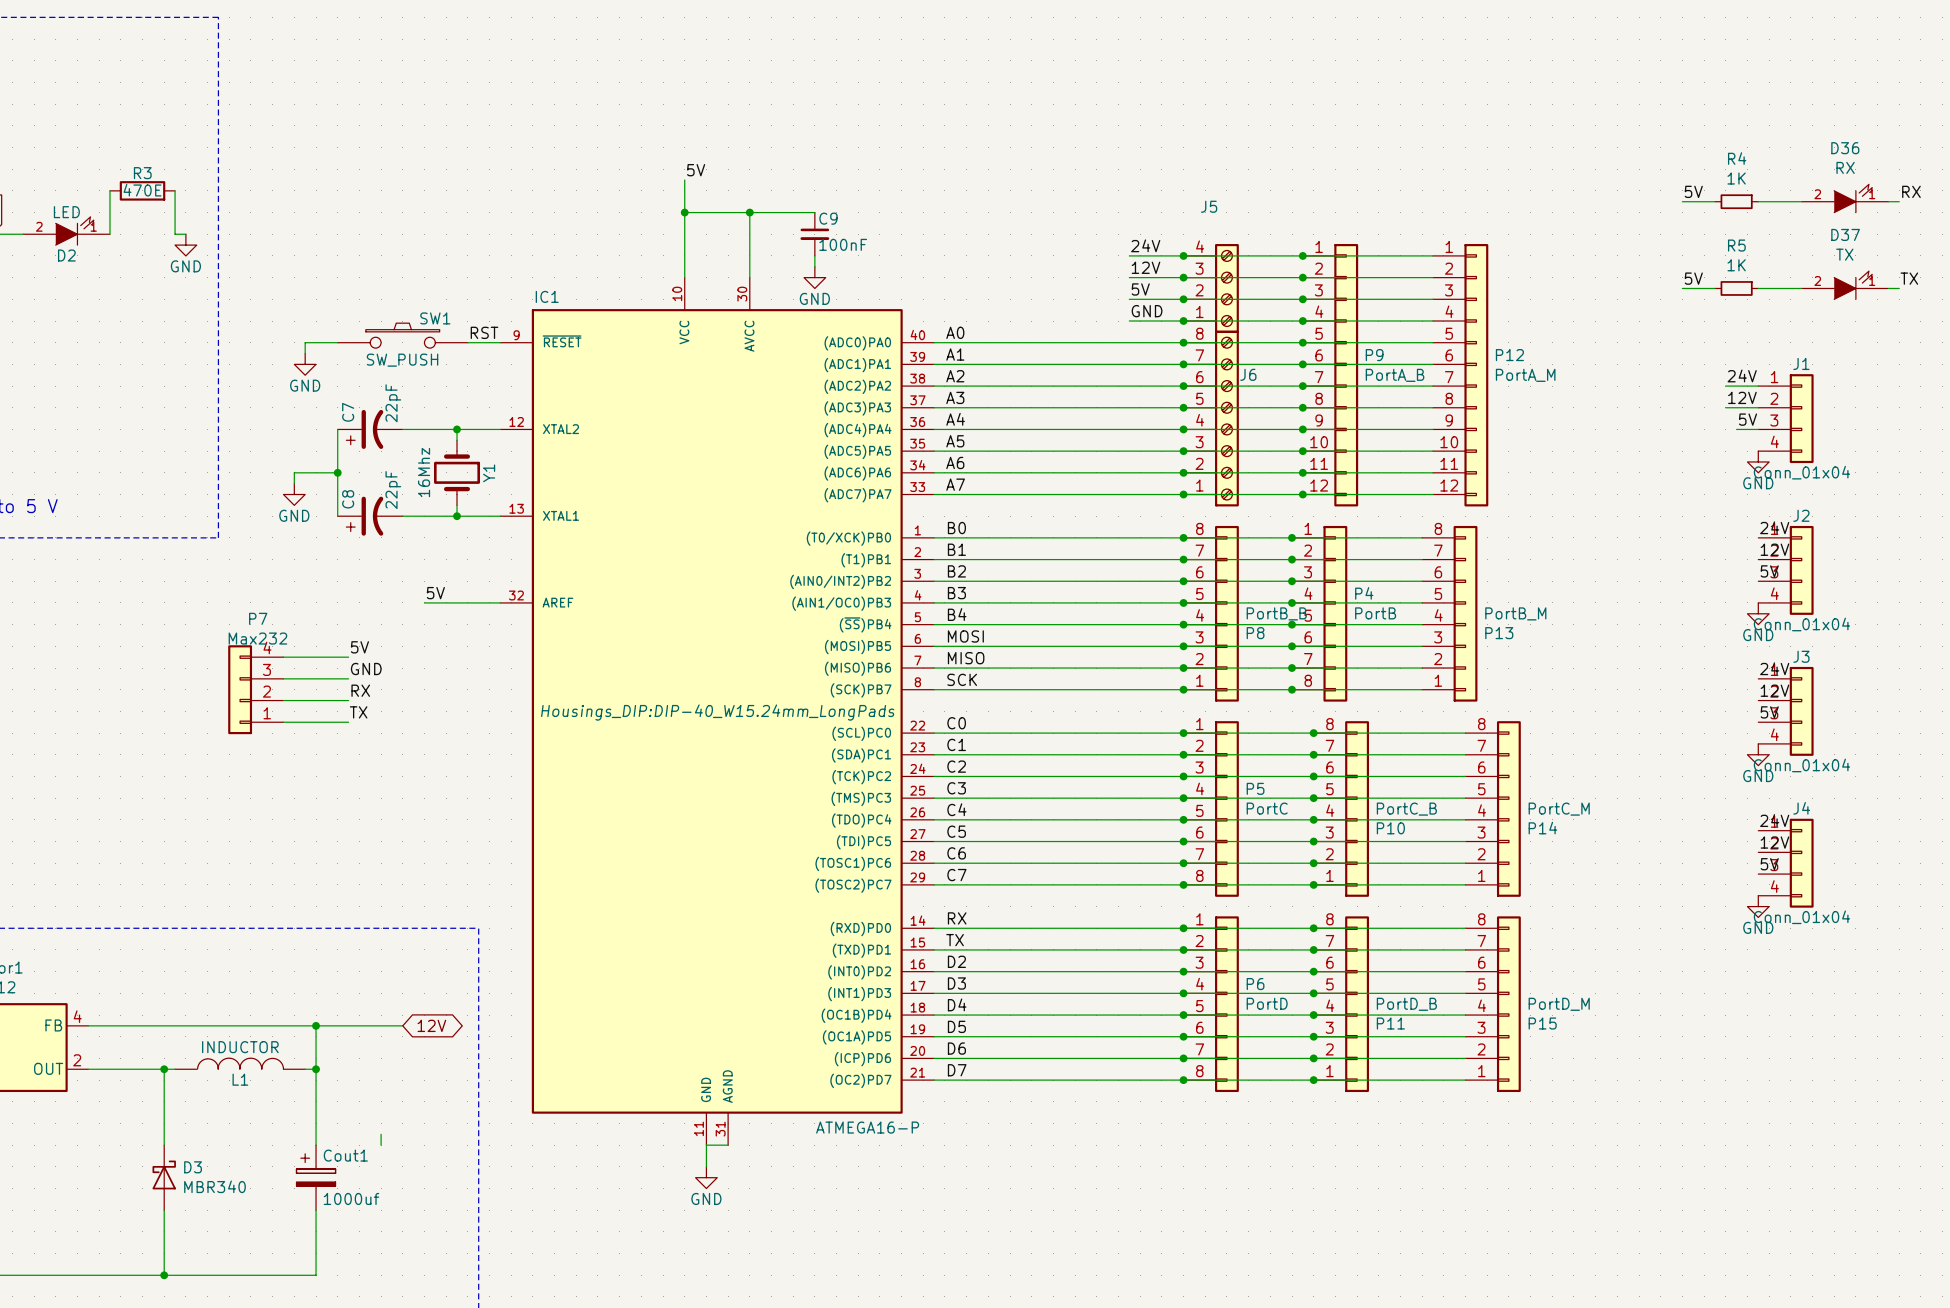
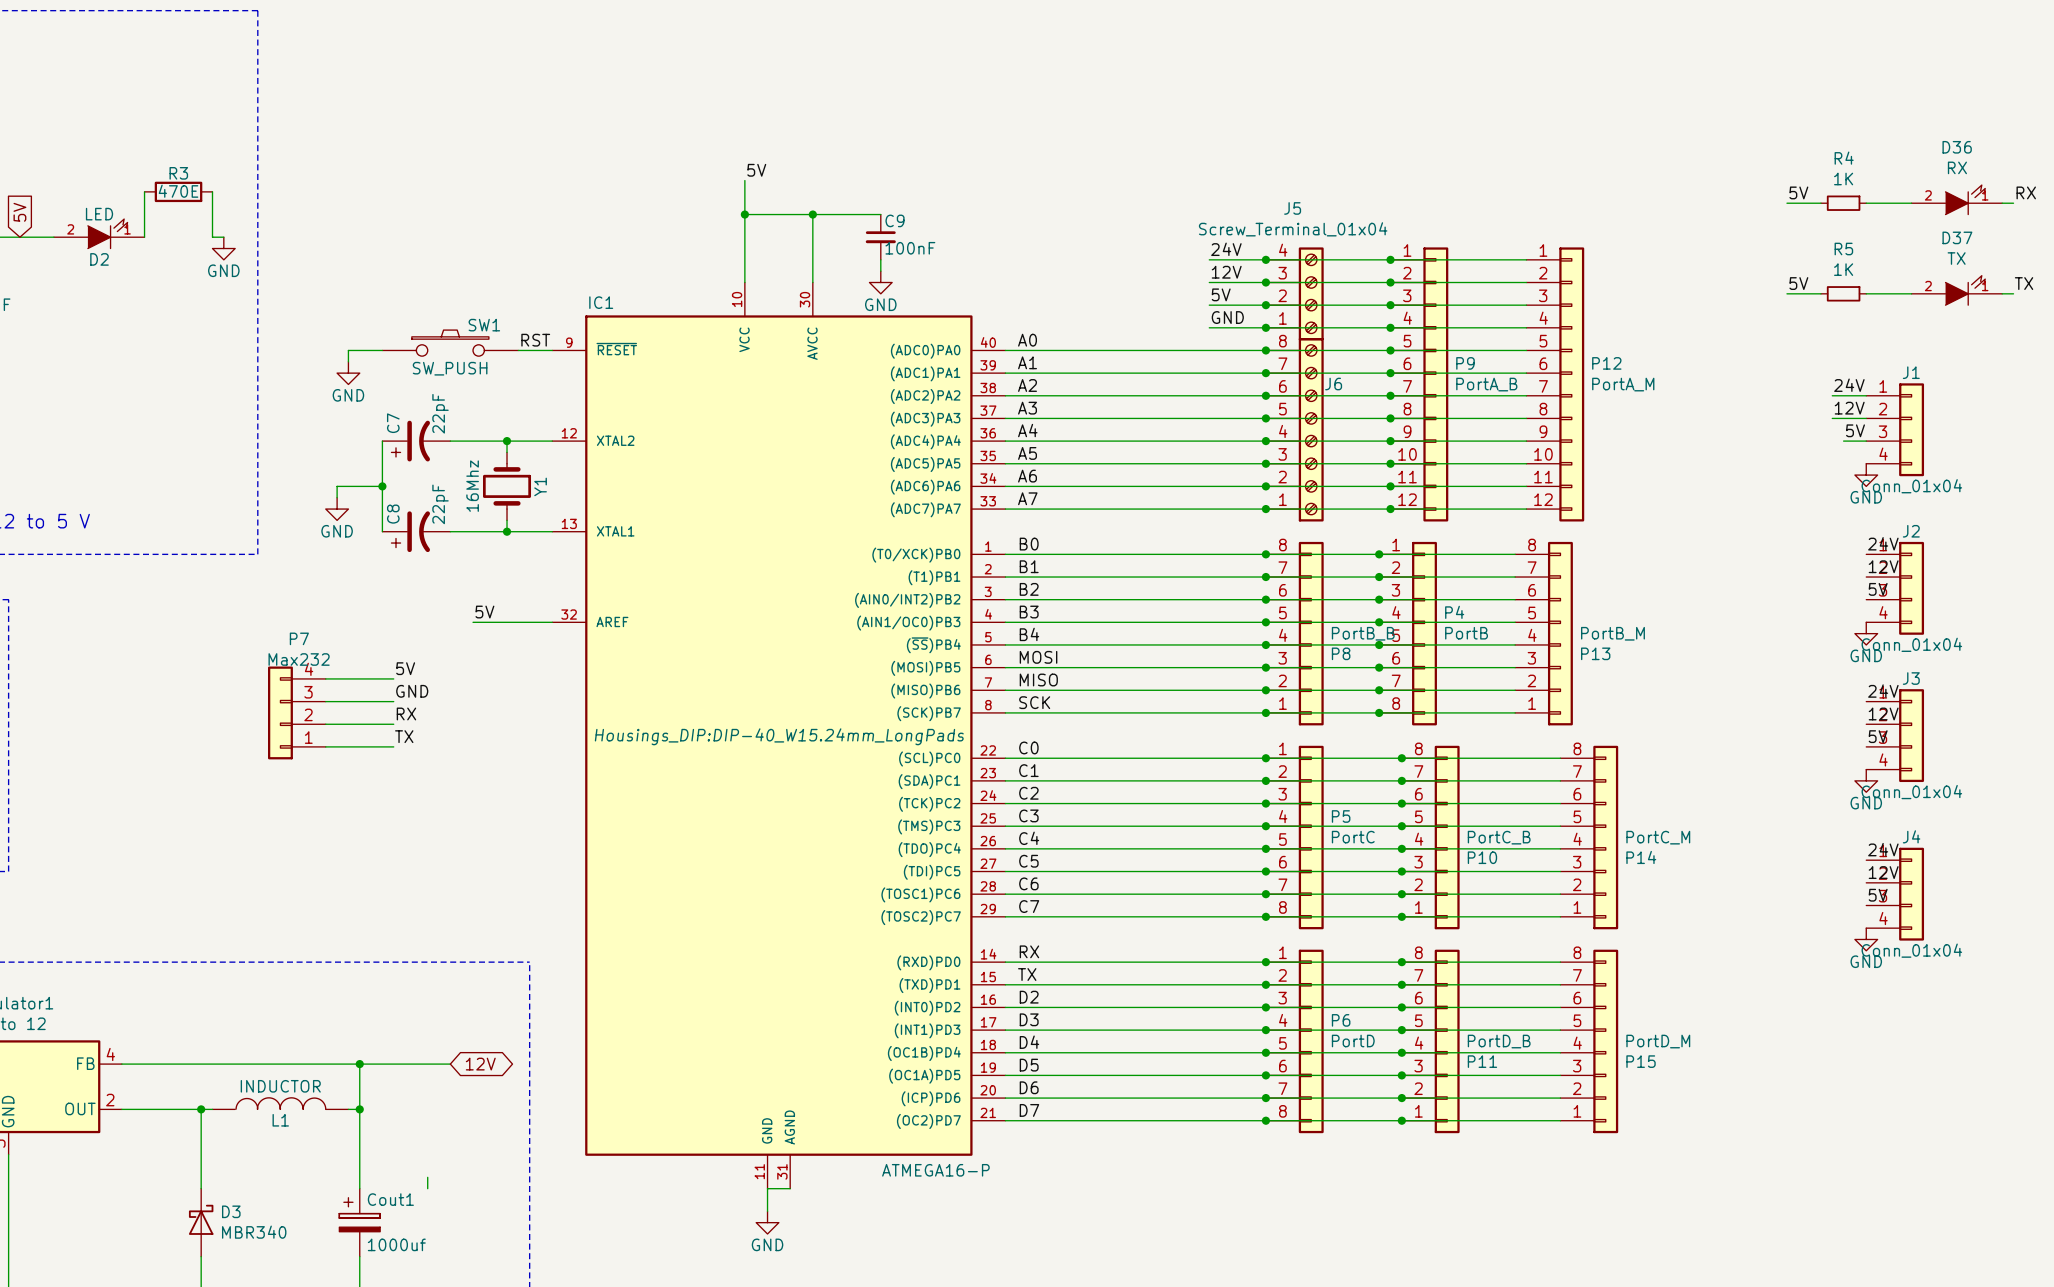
J5 value: none -> Screw_Terminal_01x04 (1293, 229)

